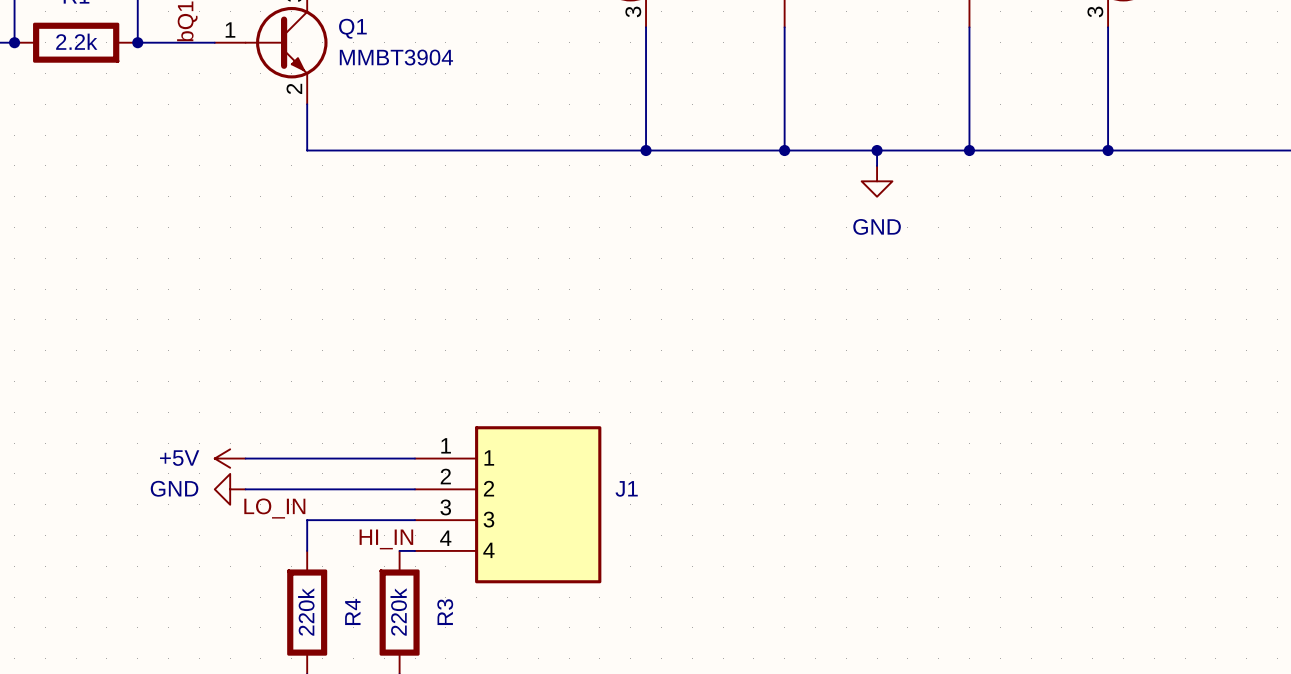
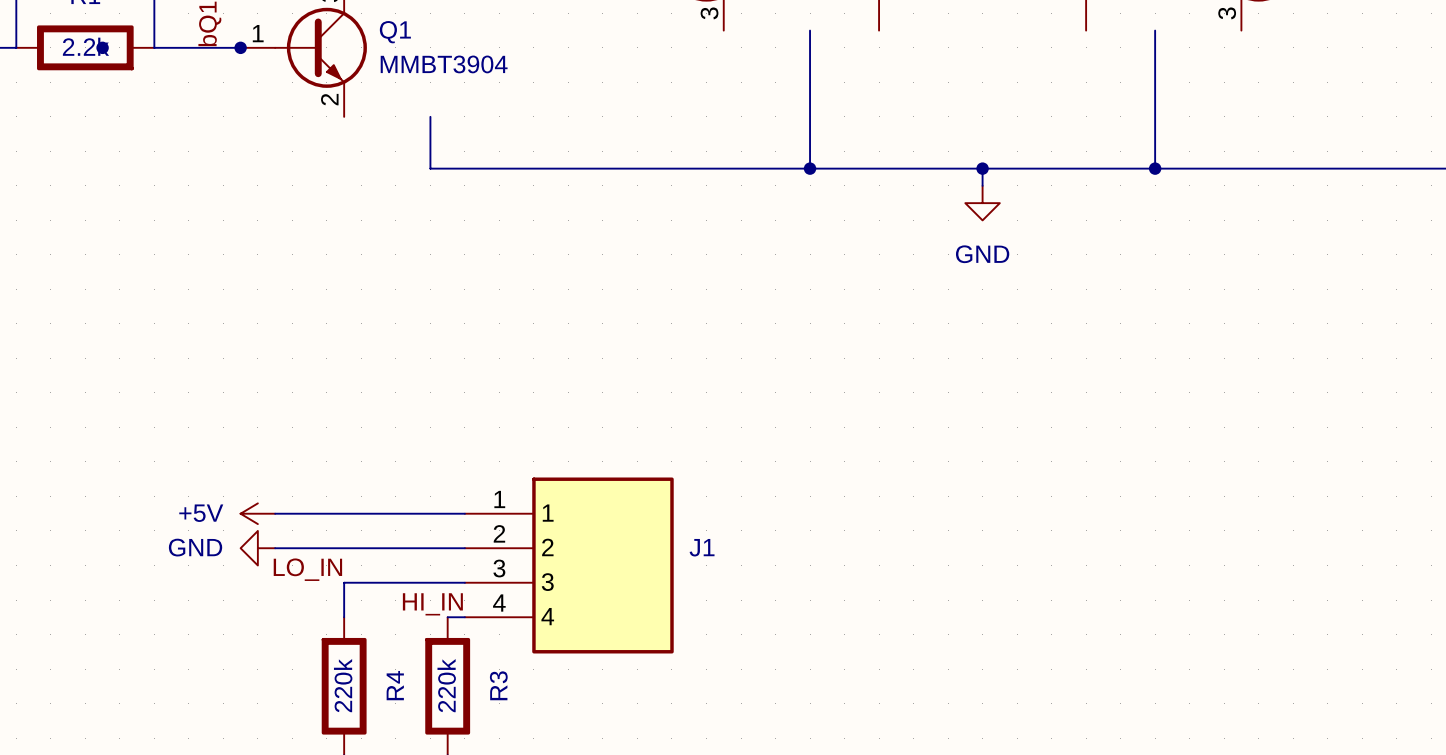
wire: (646, 27) (646, 150) -> (810, 30) (810, 168)
wire: (784, 27) (784, 150) -> none
wire: (969, 27) (969, 150) -> none
wire: (1108, 27) (1108, 150) -> (1155, 30) (1155, 168)
junction: (14, 42) -> none
junction: none -> (102, 47)
junction: (137, 42) -> none
junction: none -> (240, 47)
wire: (307, 104) (307, 150) (384, 150) -> (430, 116) (430, 168)
junction: (646, 150) -> none
junction: none -> (810, 168)
junction: (784, 150) -> none
junction: (969, 150) -> none
junction: none -> (1155, 168)
junction: (1108, 150) -> none

